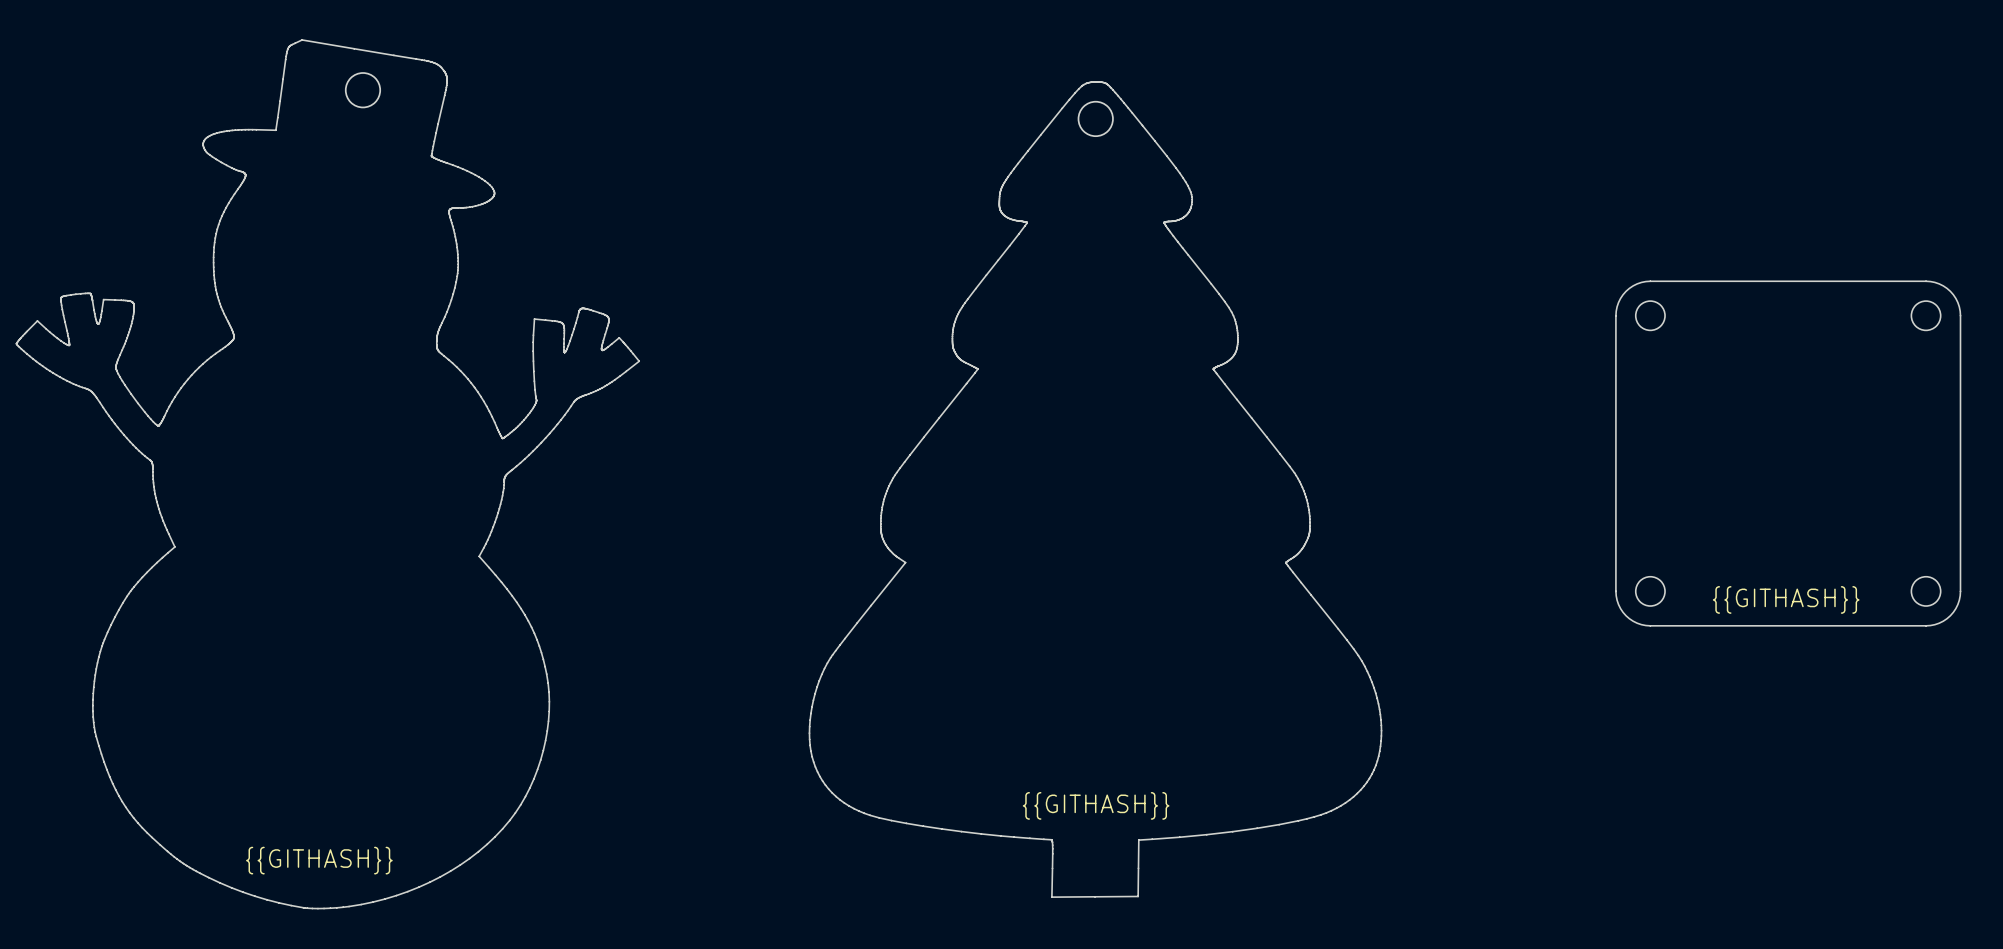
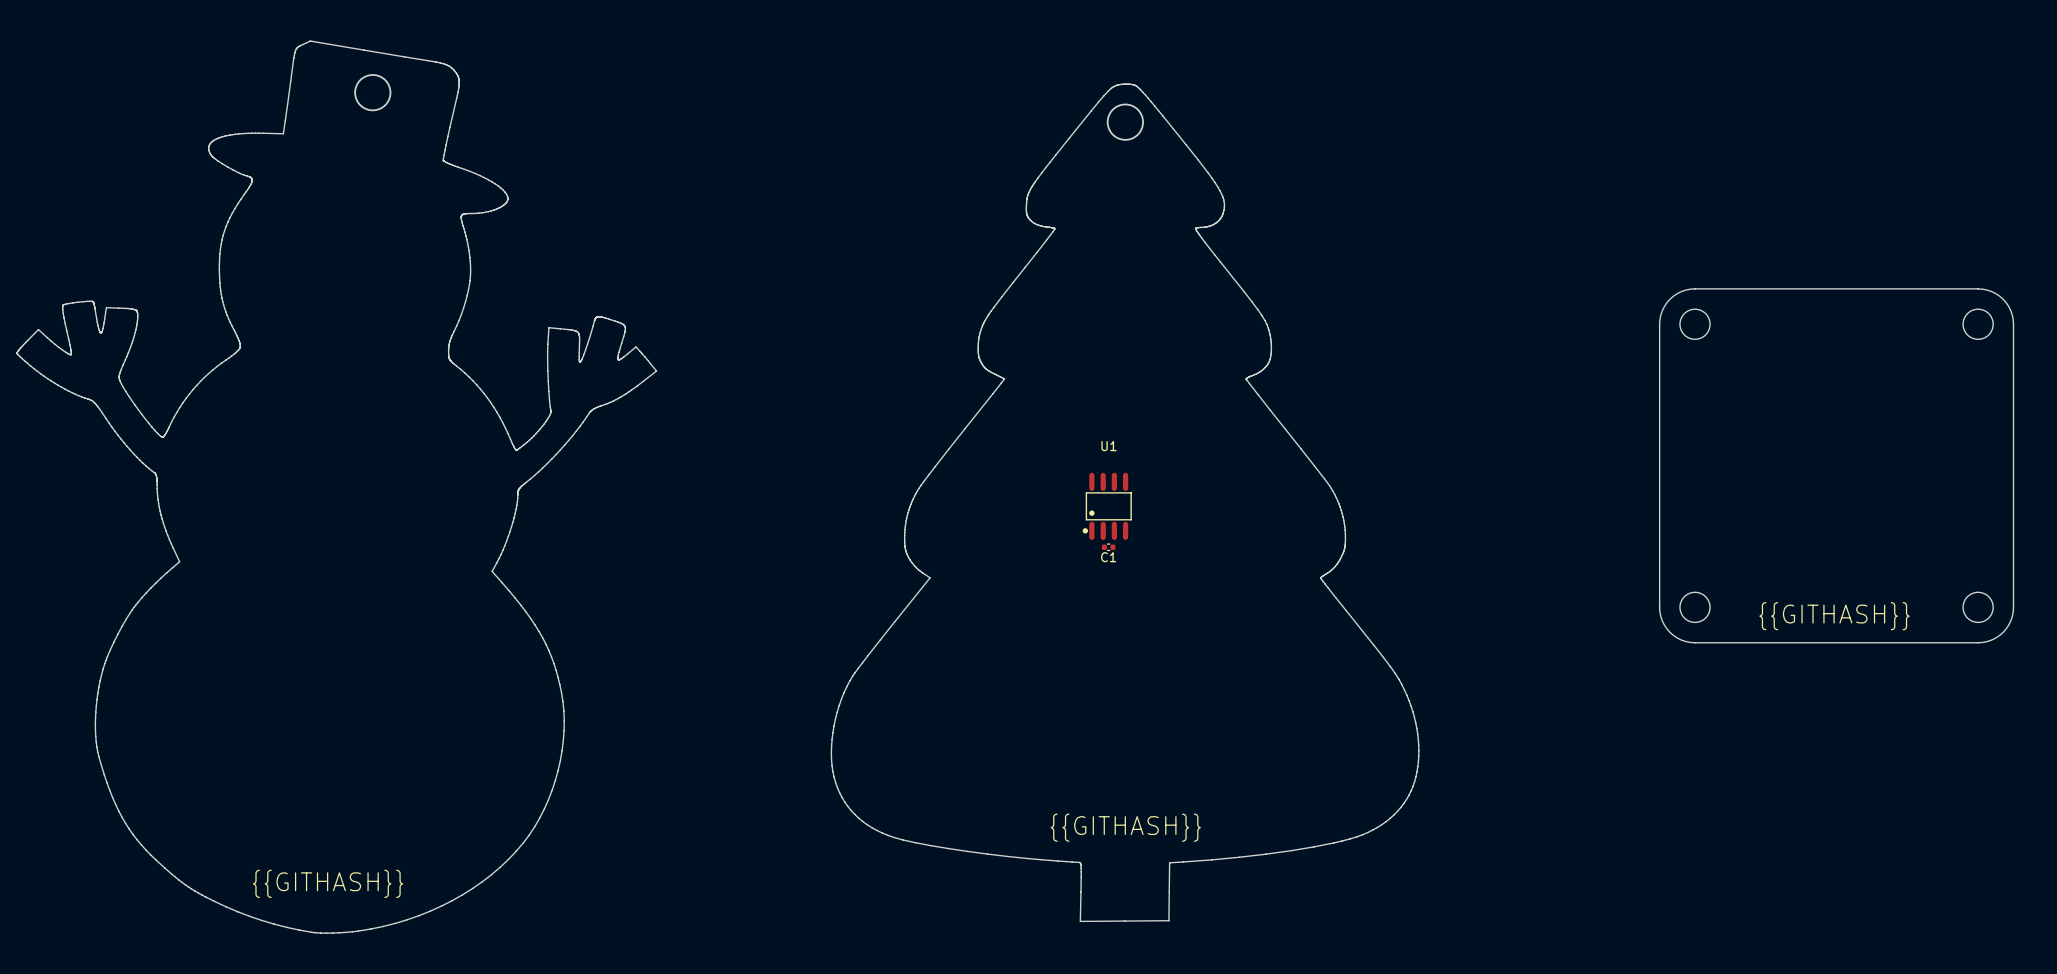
U1: none -> (1107, 506)
C1: none -> (1108, 547)

